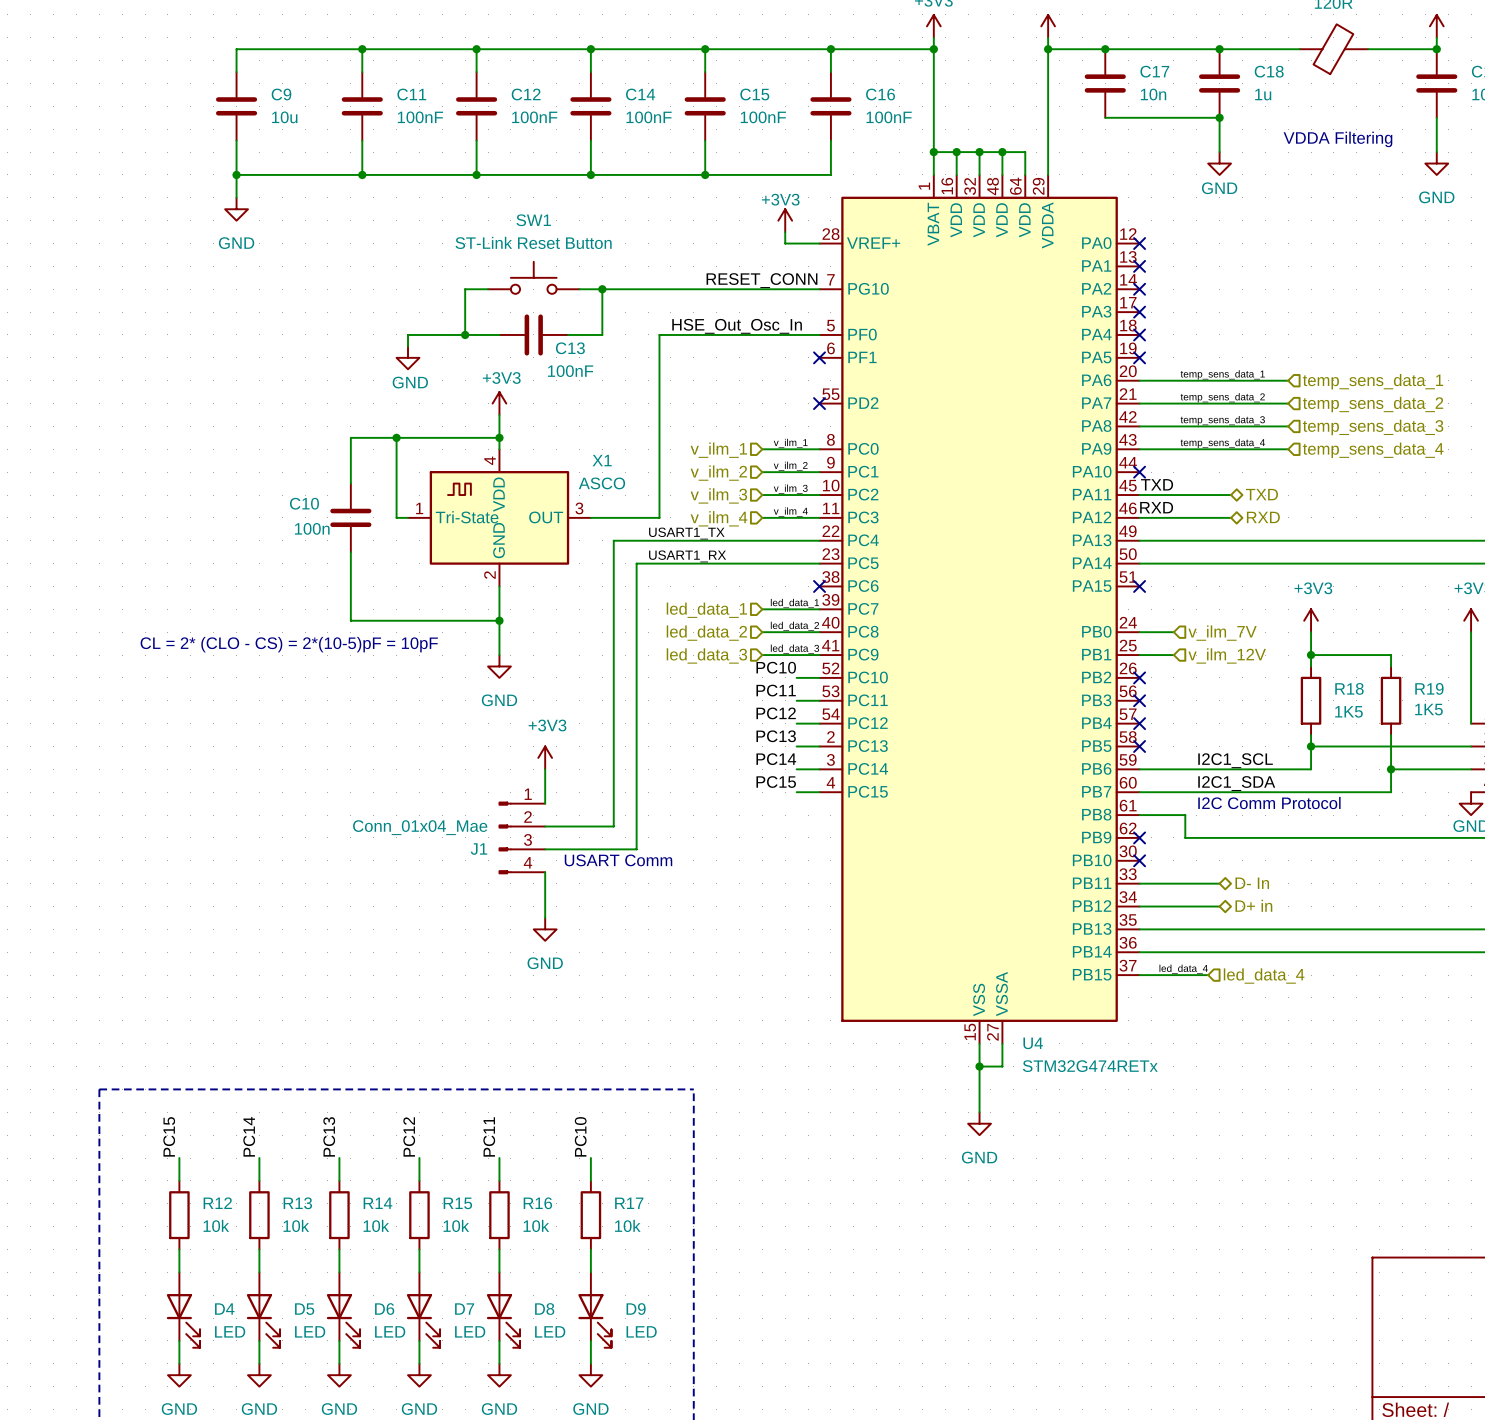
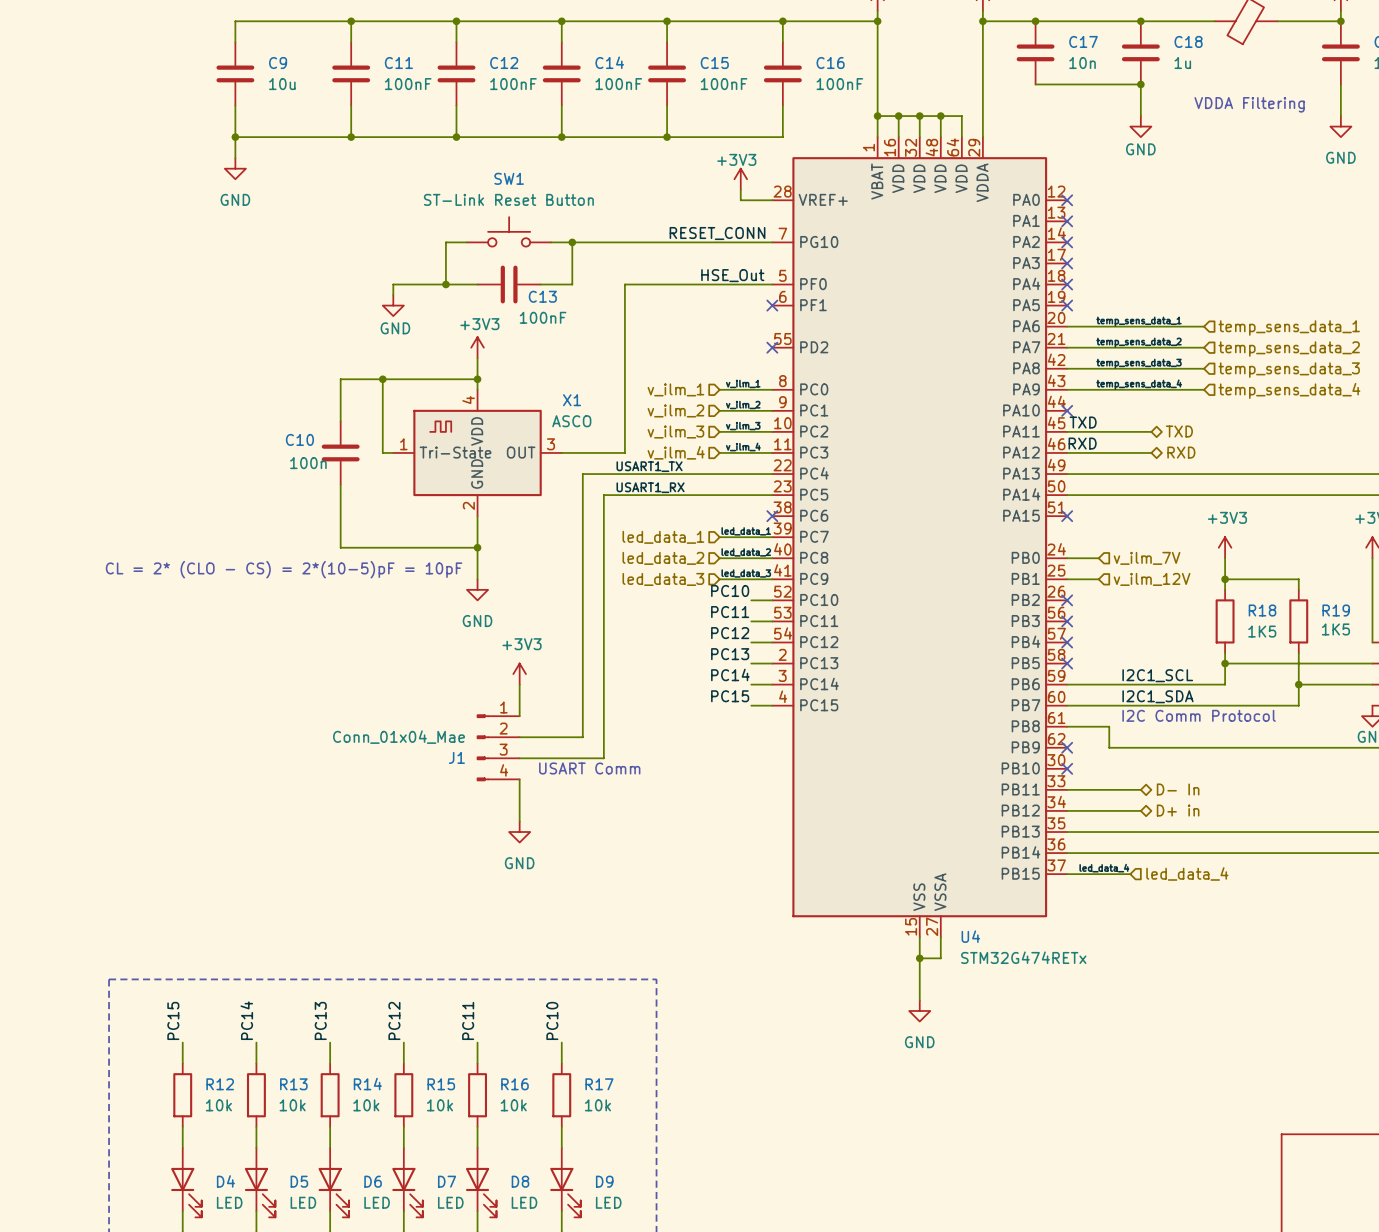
label: HSE_Out_Osc_In (737, 326) -> HSE_Out (732, 275)

